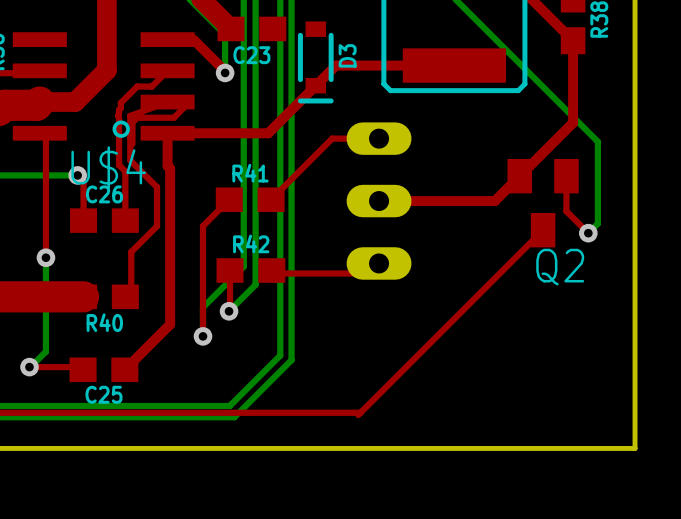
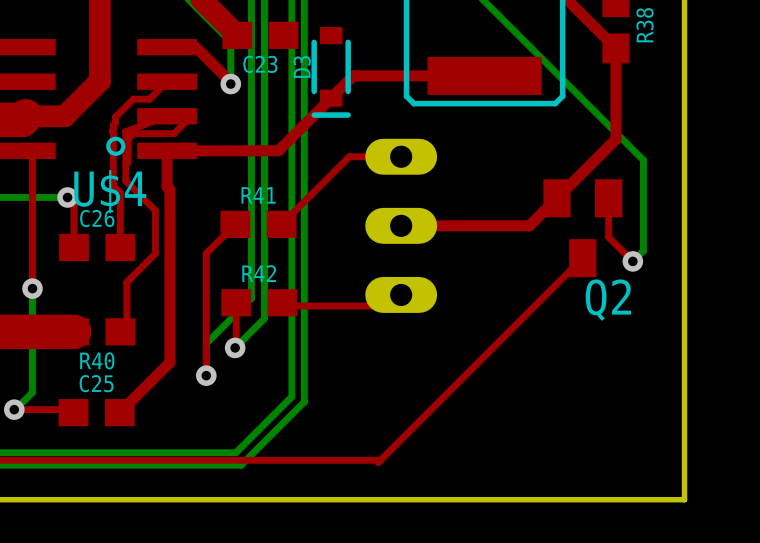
D3 name position: D3 (347, 55) -> D3 (302, 66)
C25 name position: C25 (103, 394) -> C25 (96, 383)

